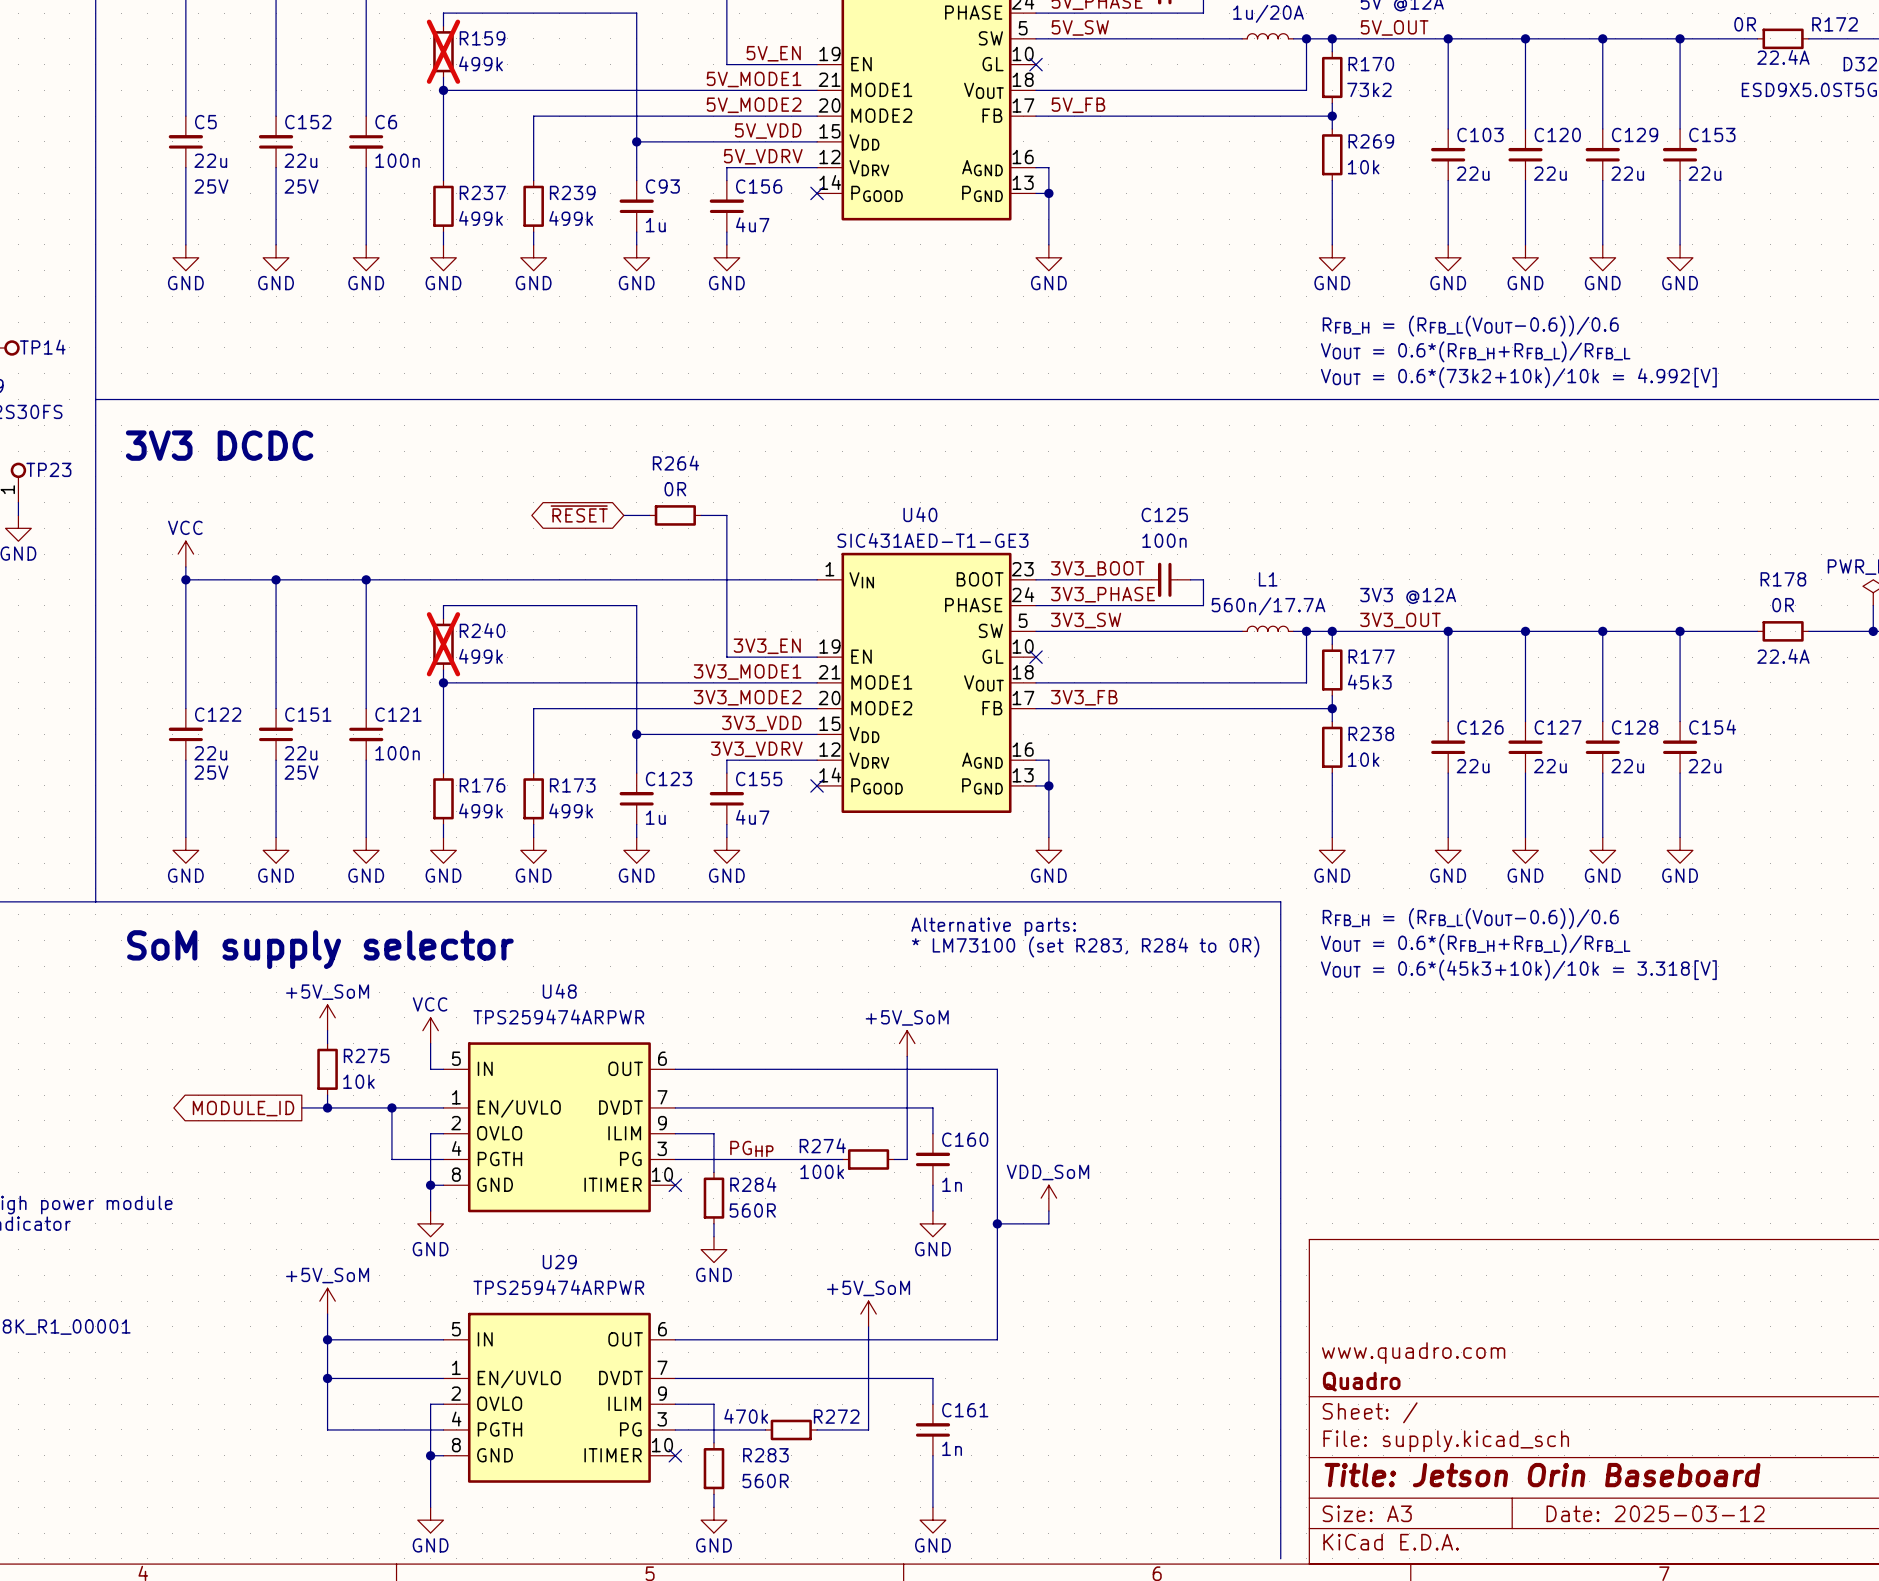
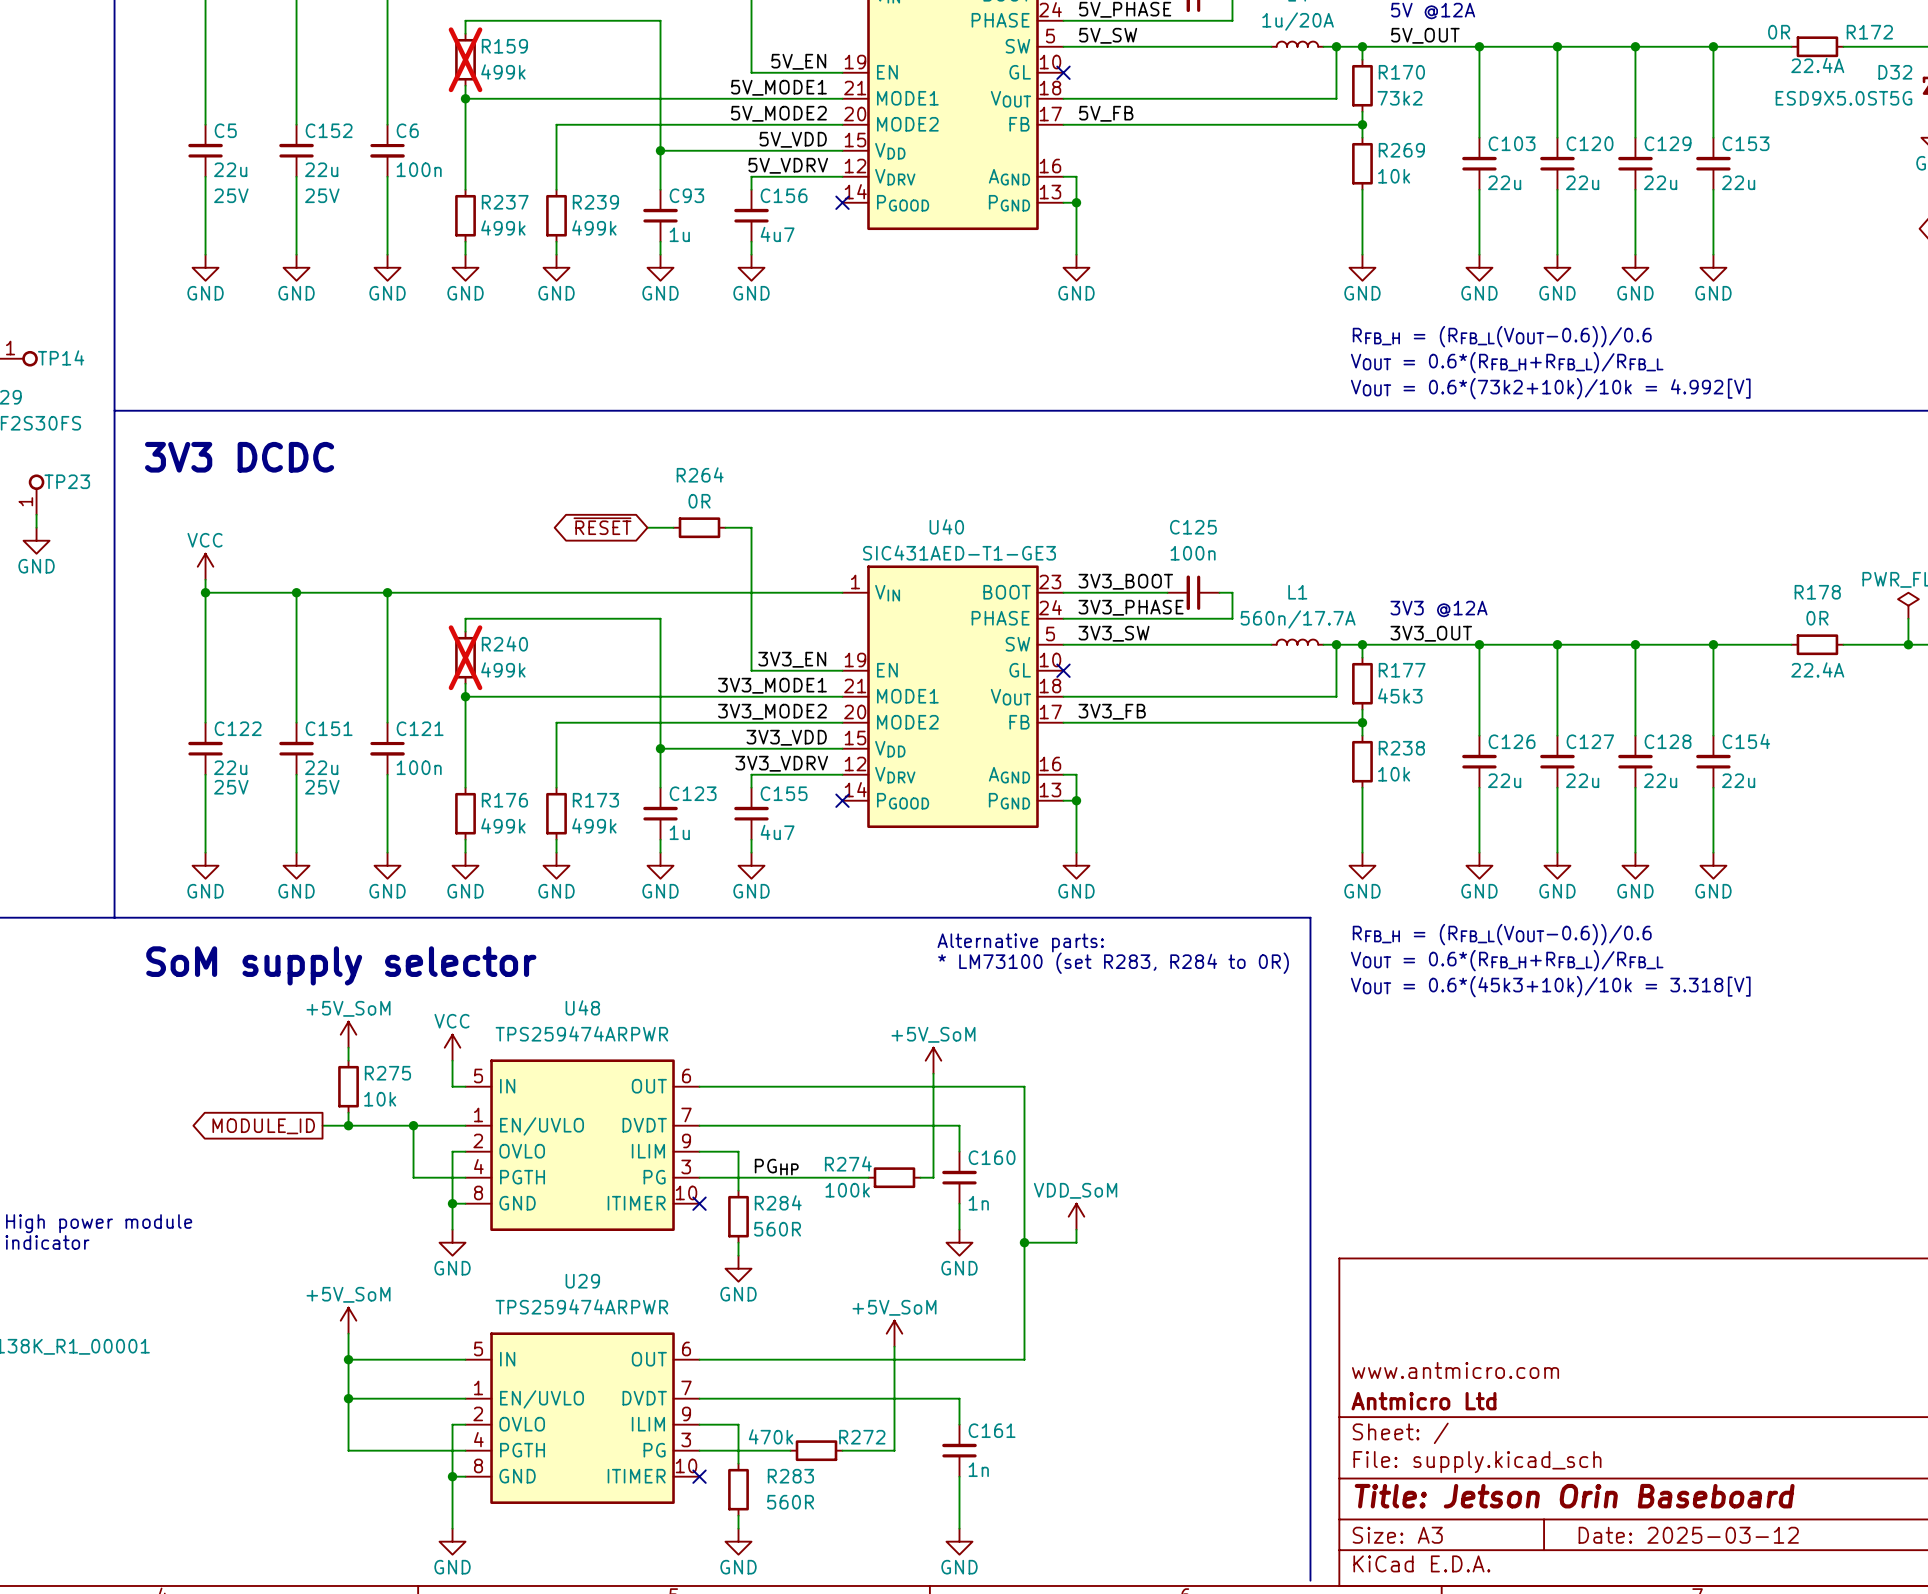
title block: www.quadro.com (1413, 1353) -> www.antmicro.com (1455, 1370)
title block: Quadro (1361, 1381) -> Antmicro Ltd (1423, 1401)

